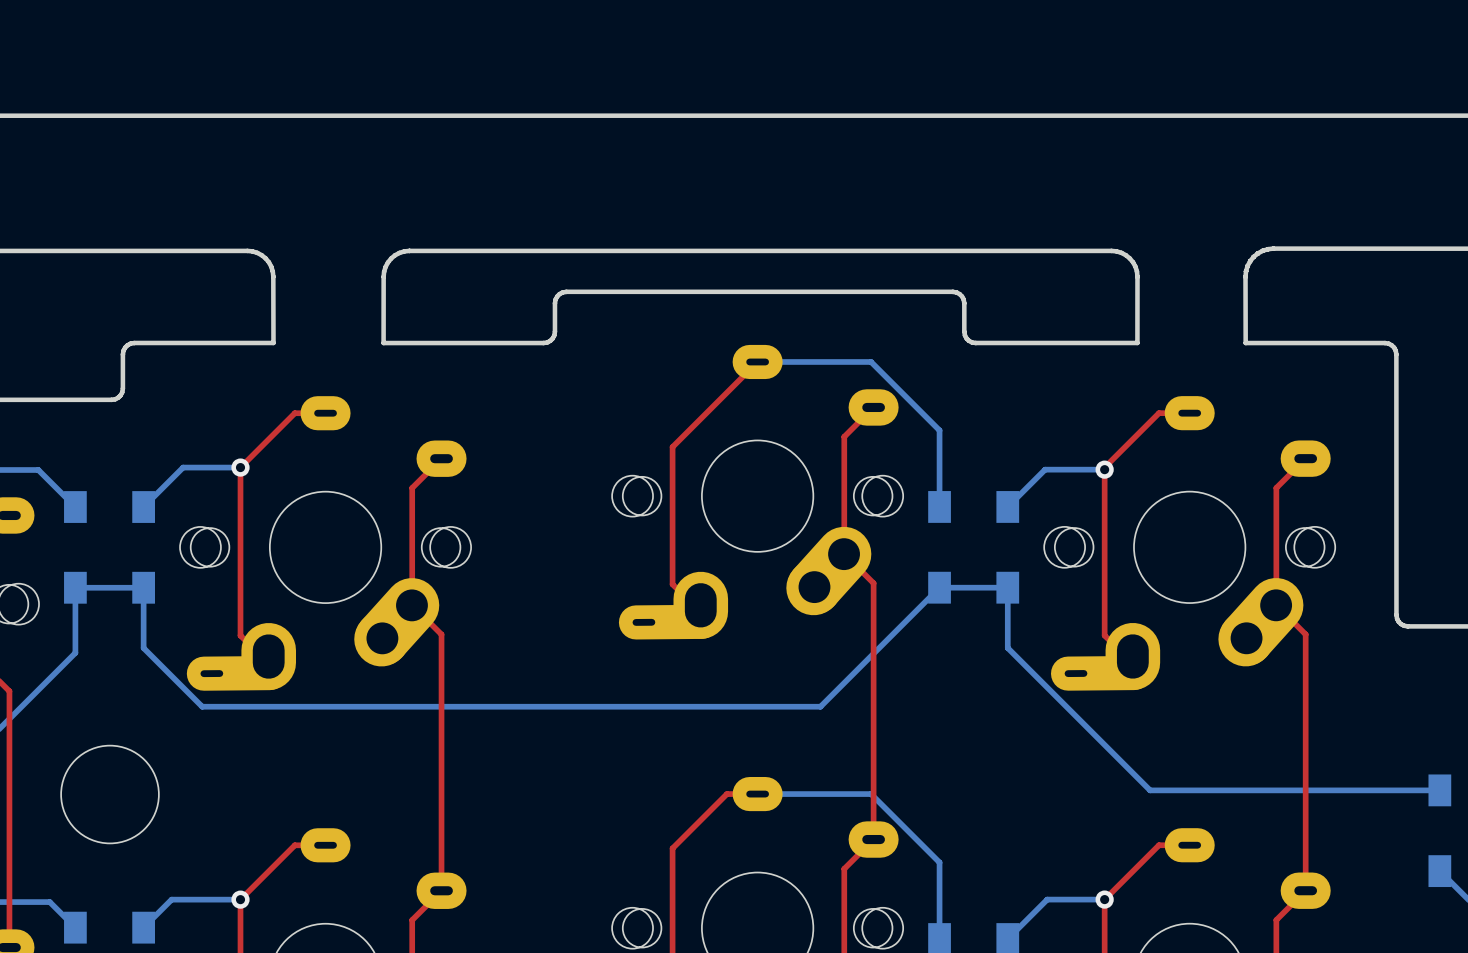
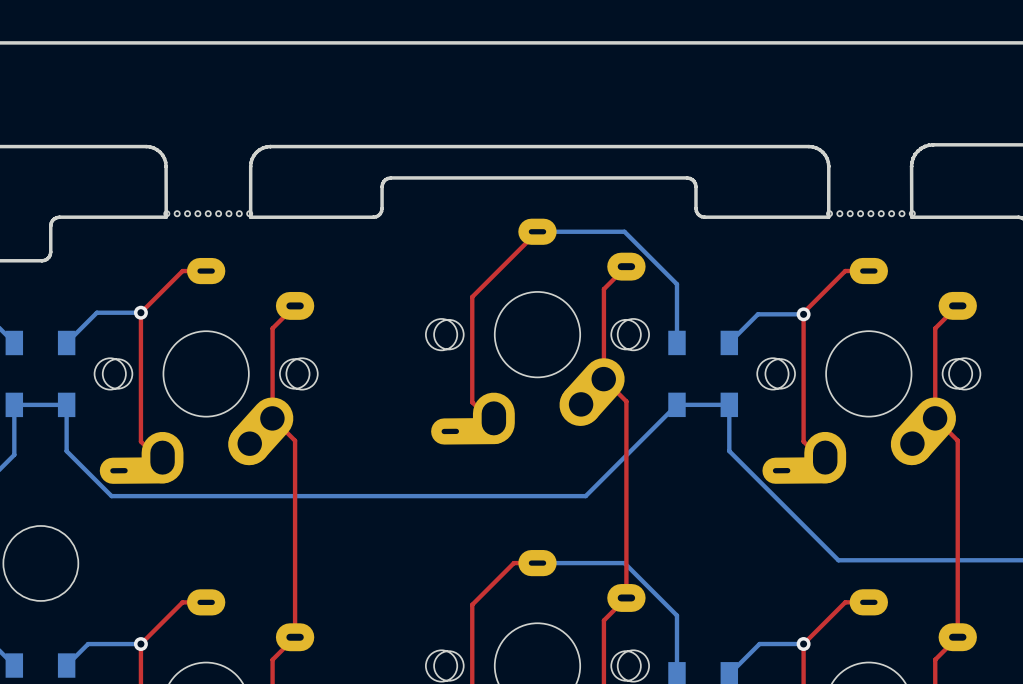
part: none -> (208, 213)
part: none -> (870, 213)

